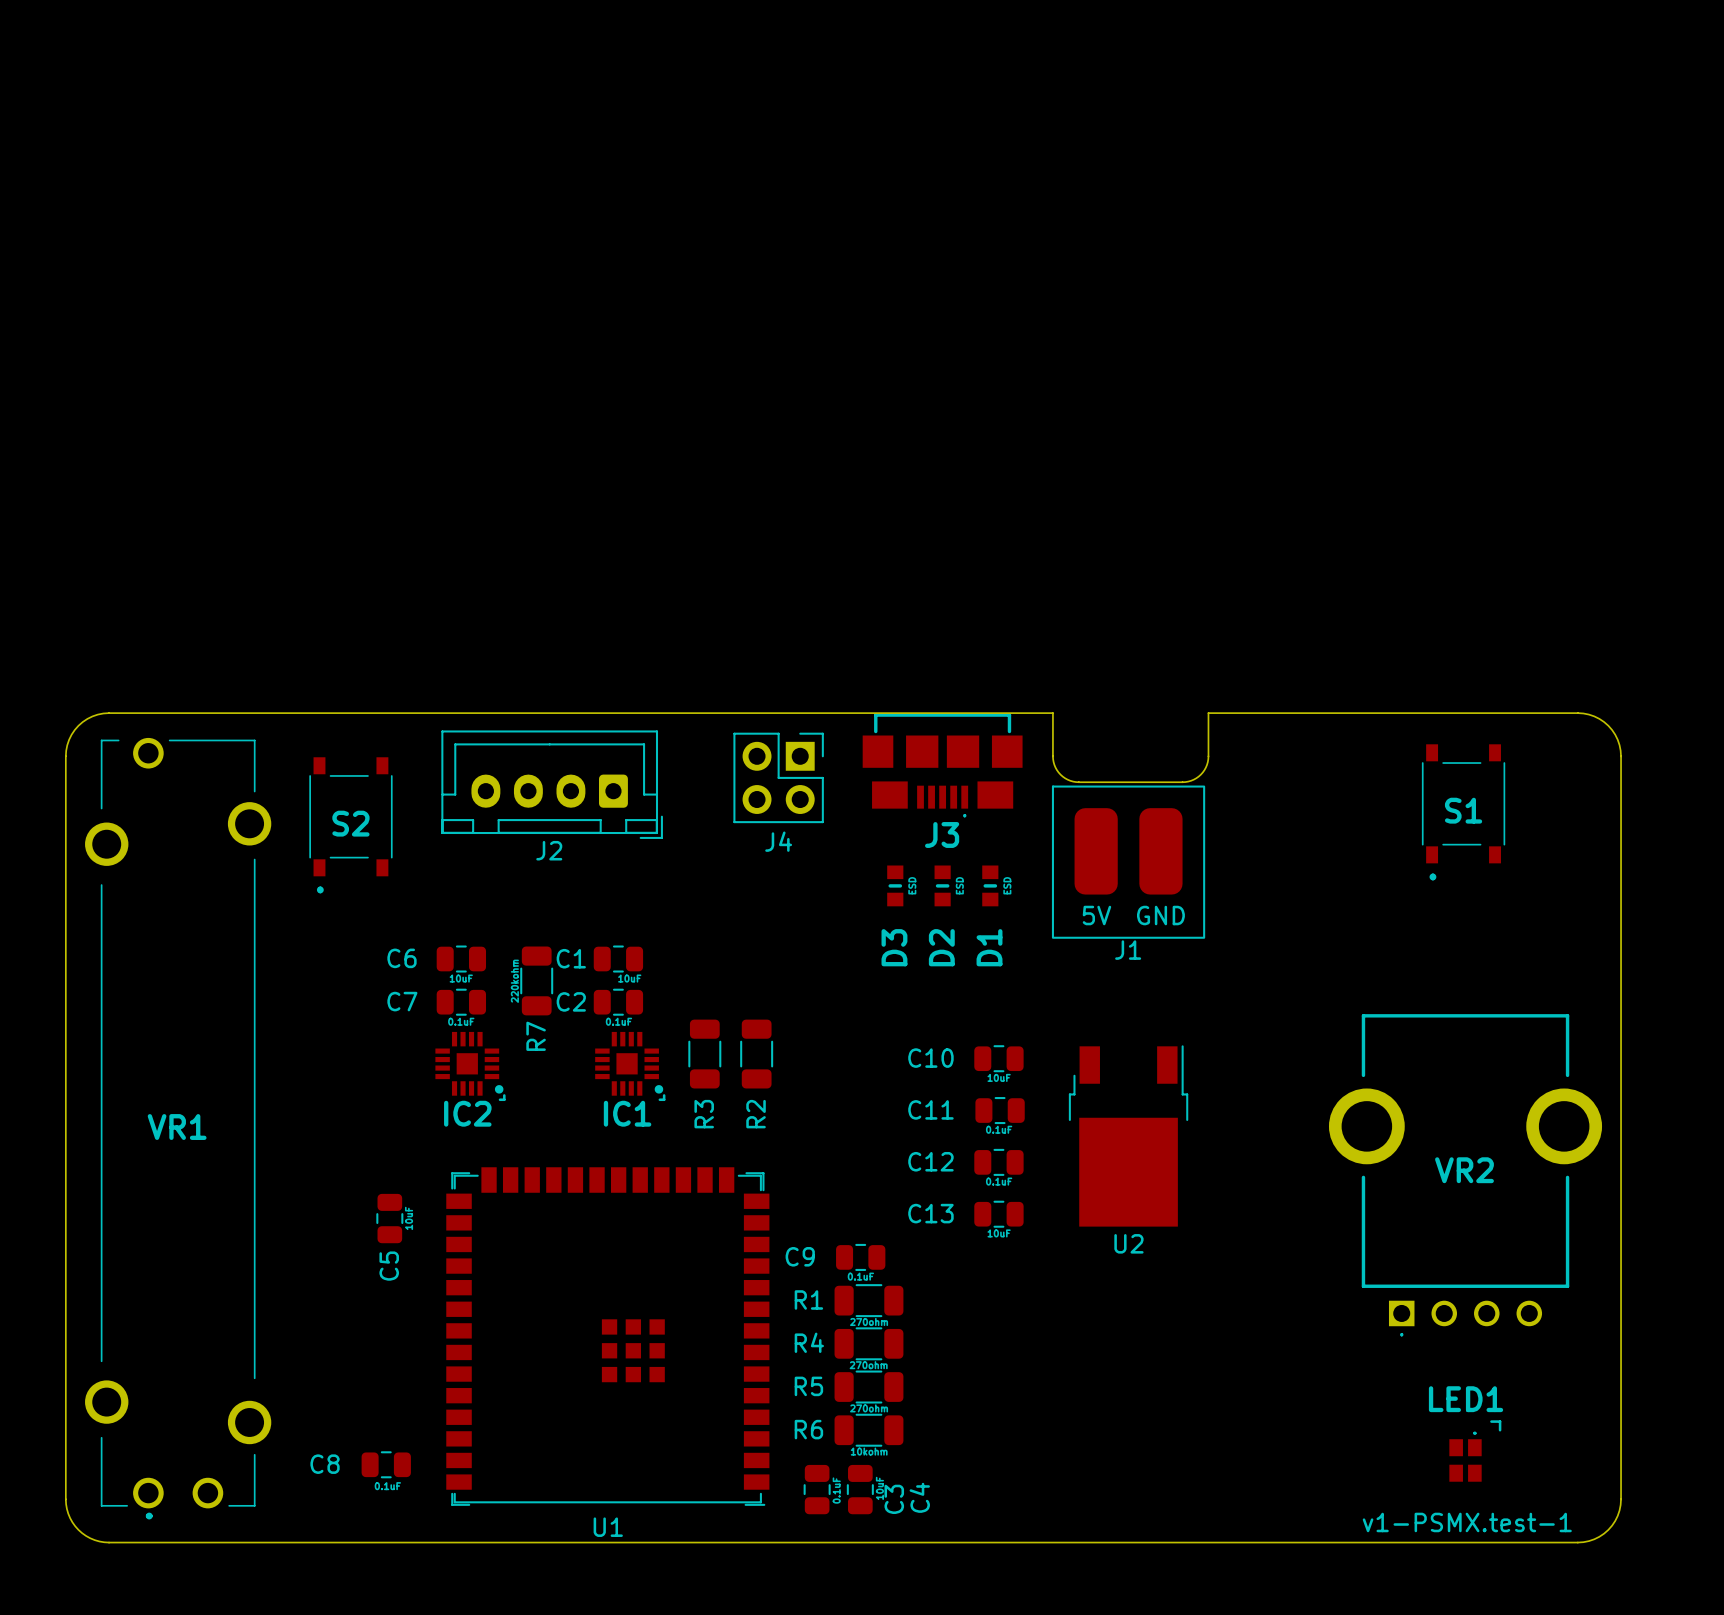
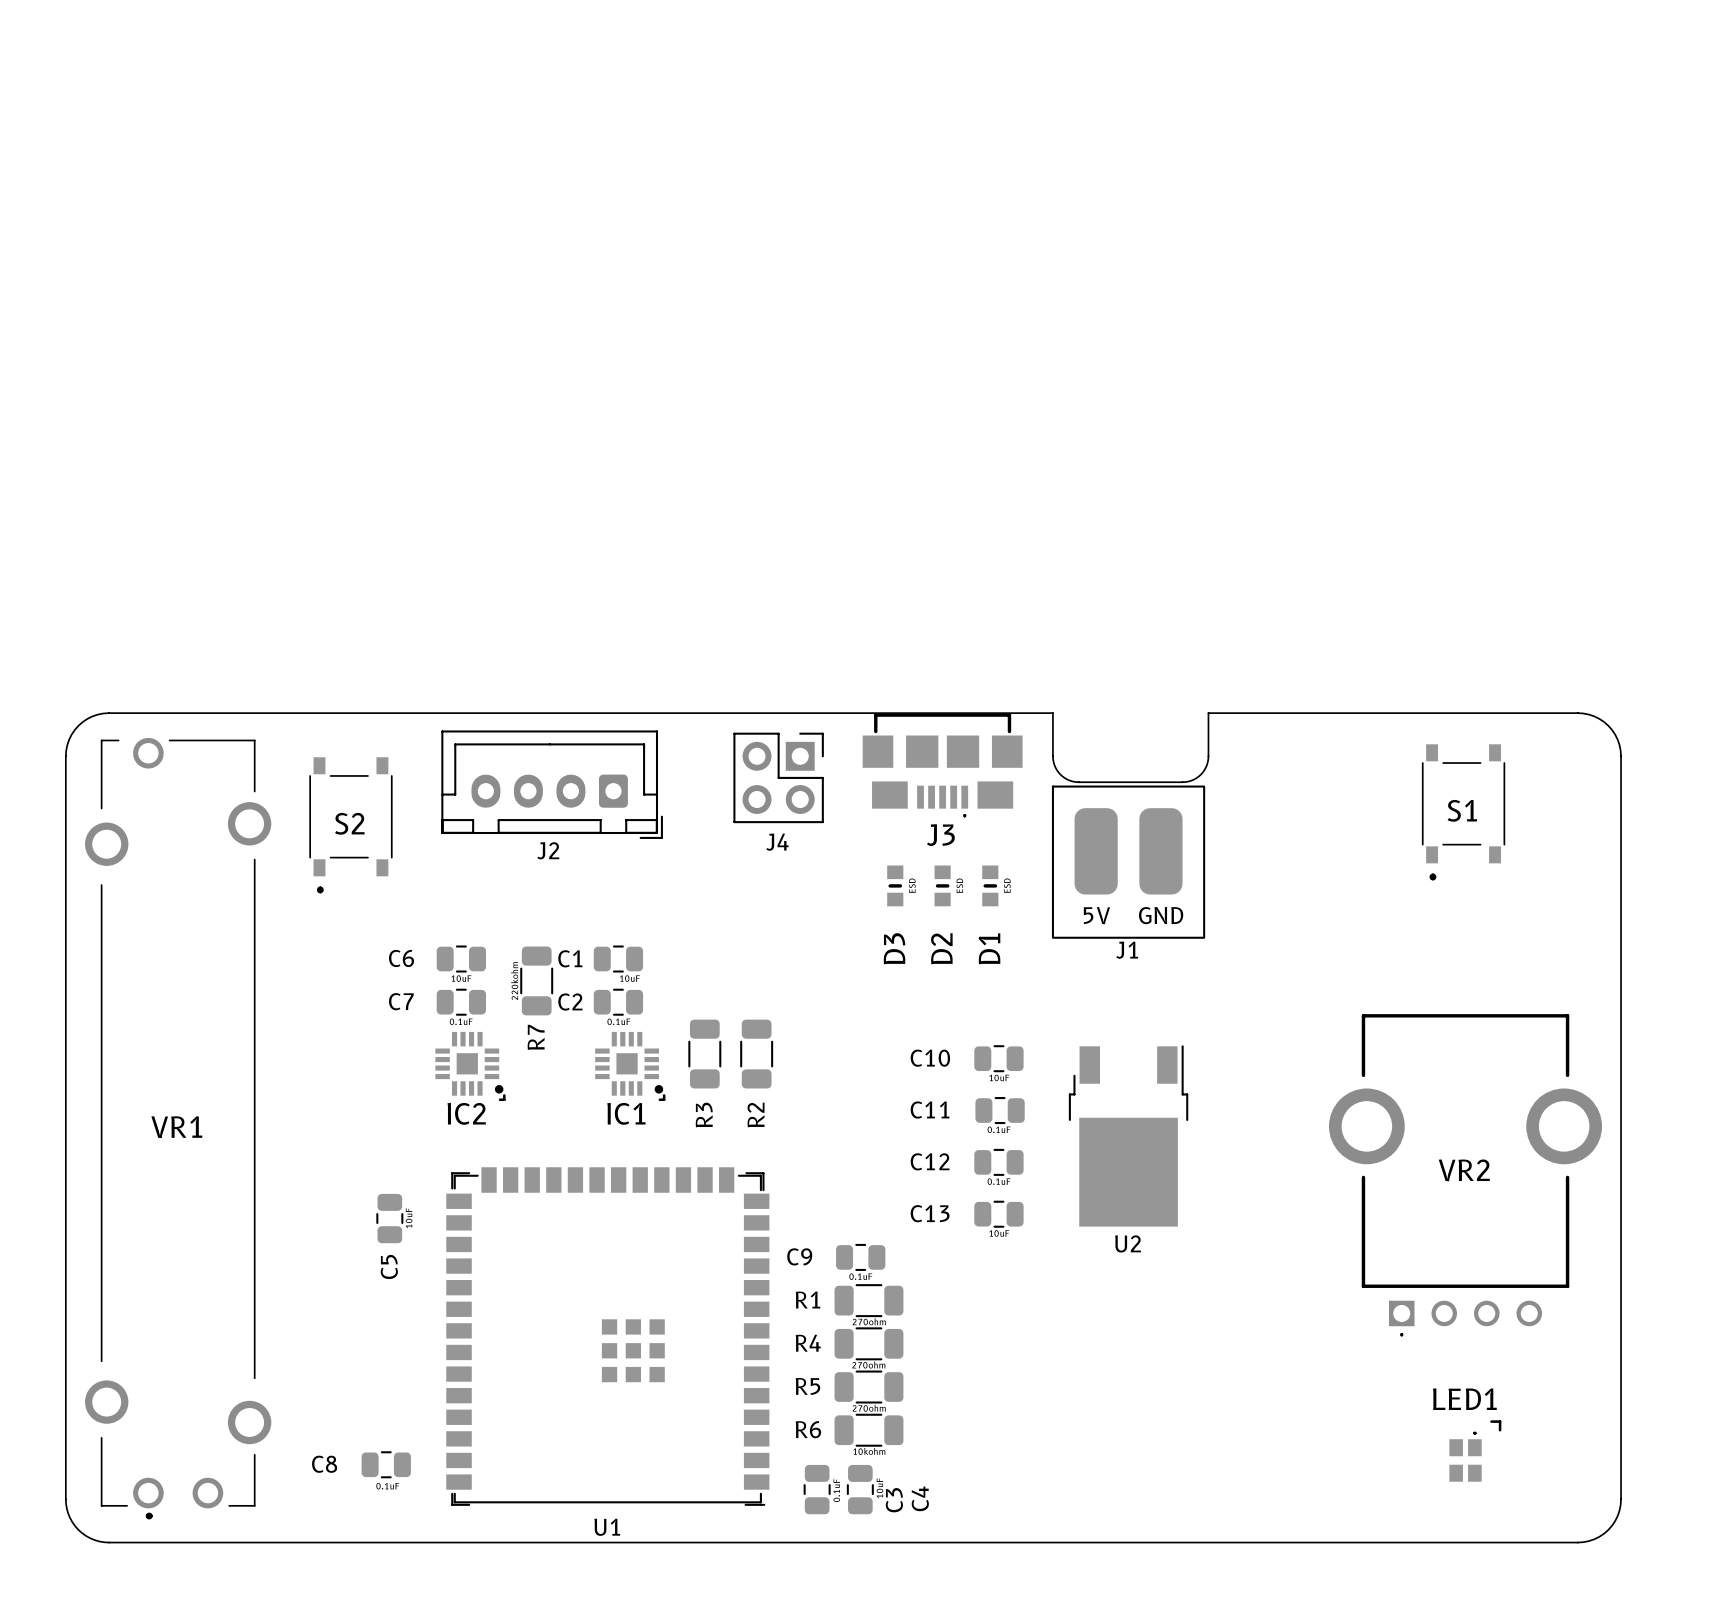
text: v1-PSMX.test-1 (1467, 1522) -> none

